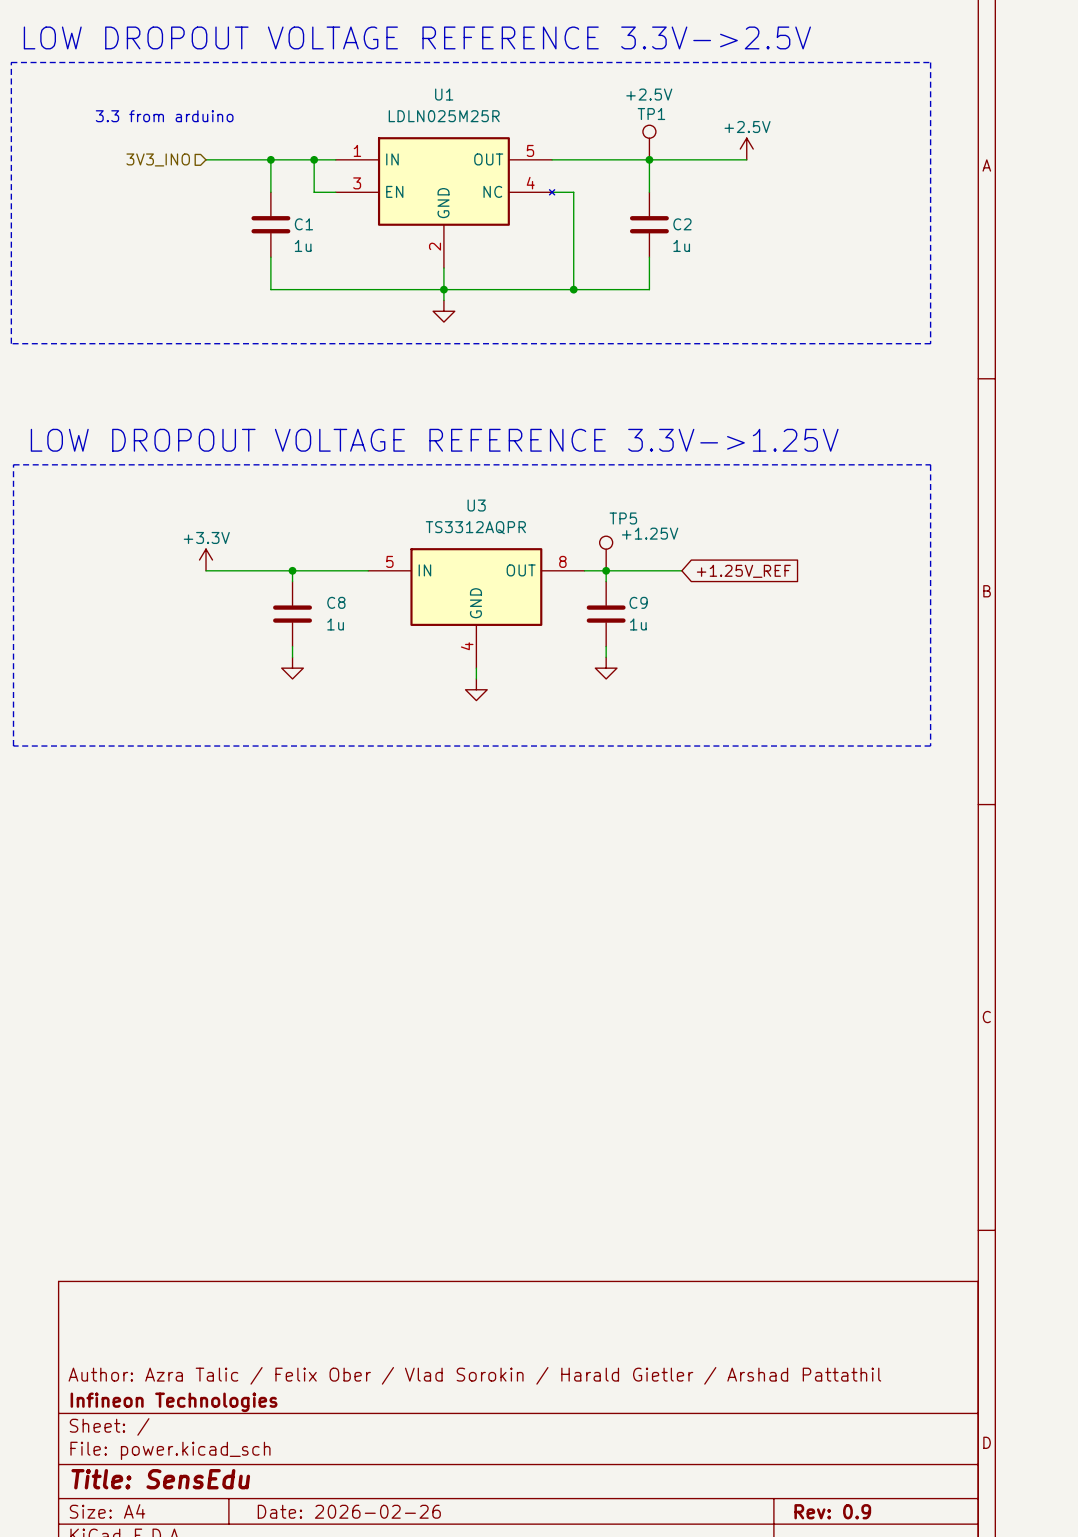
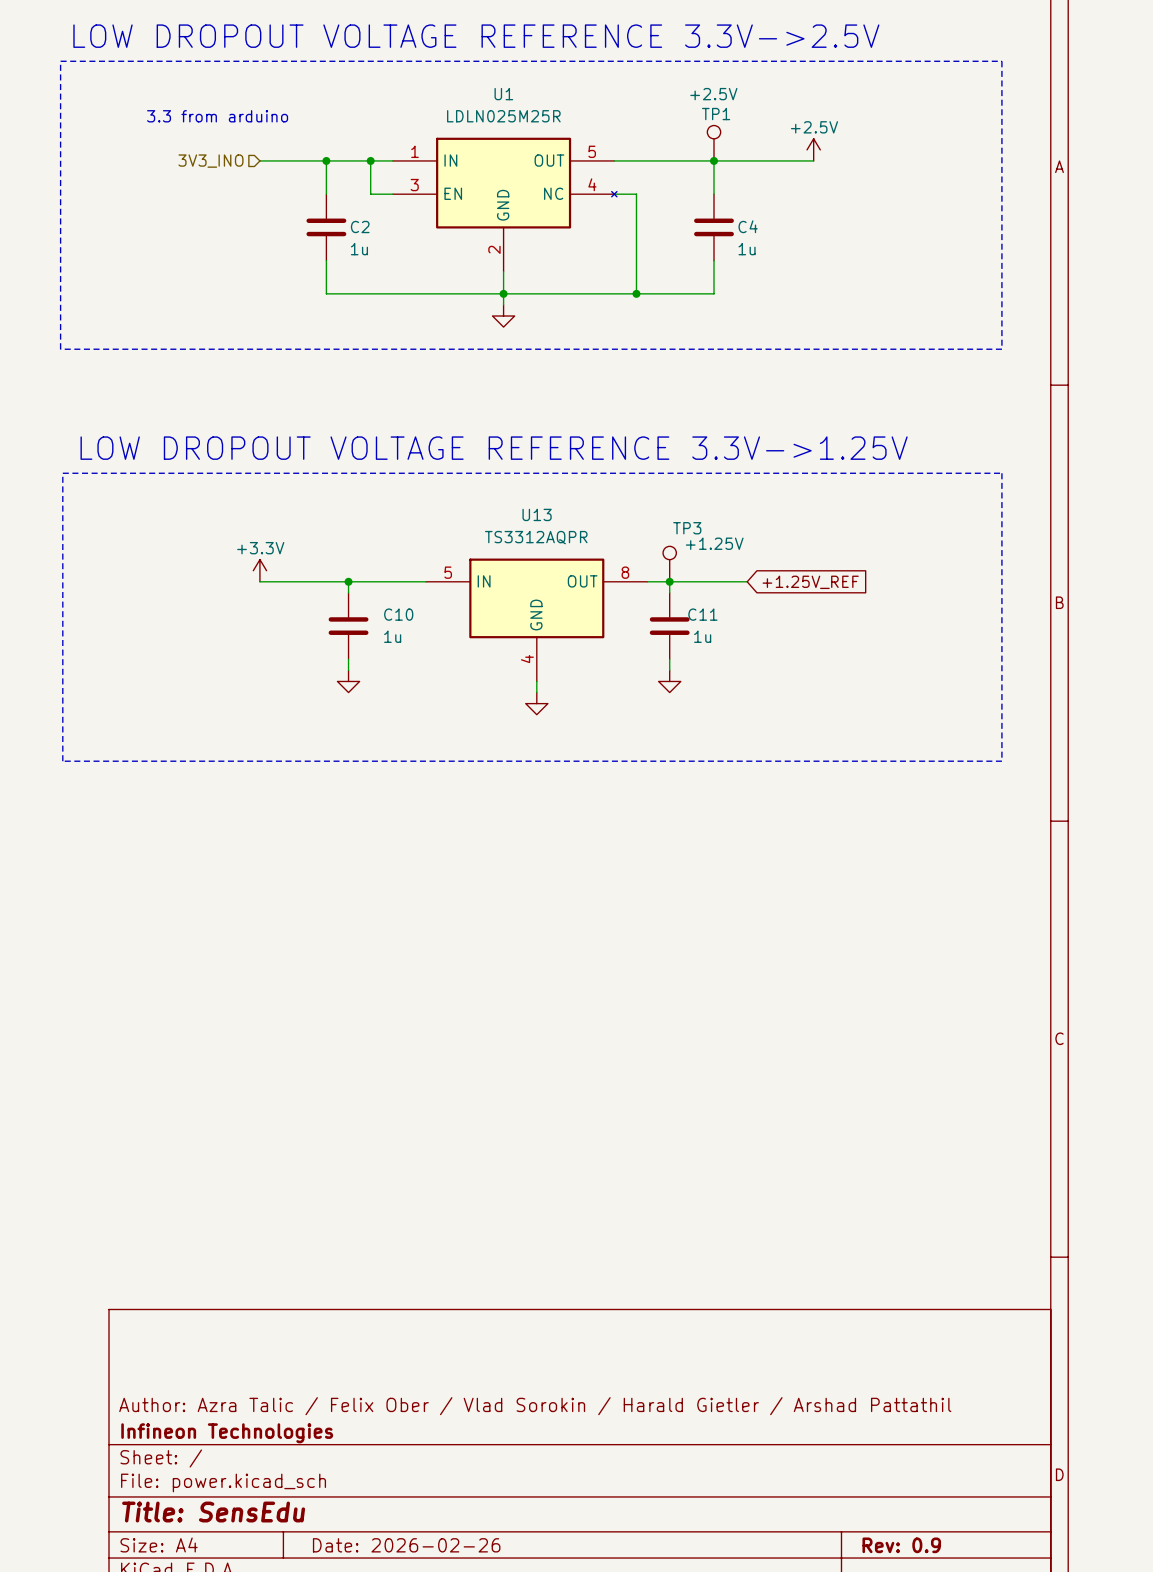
C1 name: C1 (303, 224) -> C2 (360, 227)
C2 name: C2 (682, 224) -> C4 (748, 226)
U3 name: U3 (476, 505) -> U13 (537, 514)
TP5 name: TP5 (623, 518) -> TP3 (687, 528)
C8 name: C8 (336, 602) -> C10 (398, 614)
C9 name: C9 (638, 602) -> C11 (702, 614)

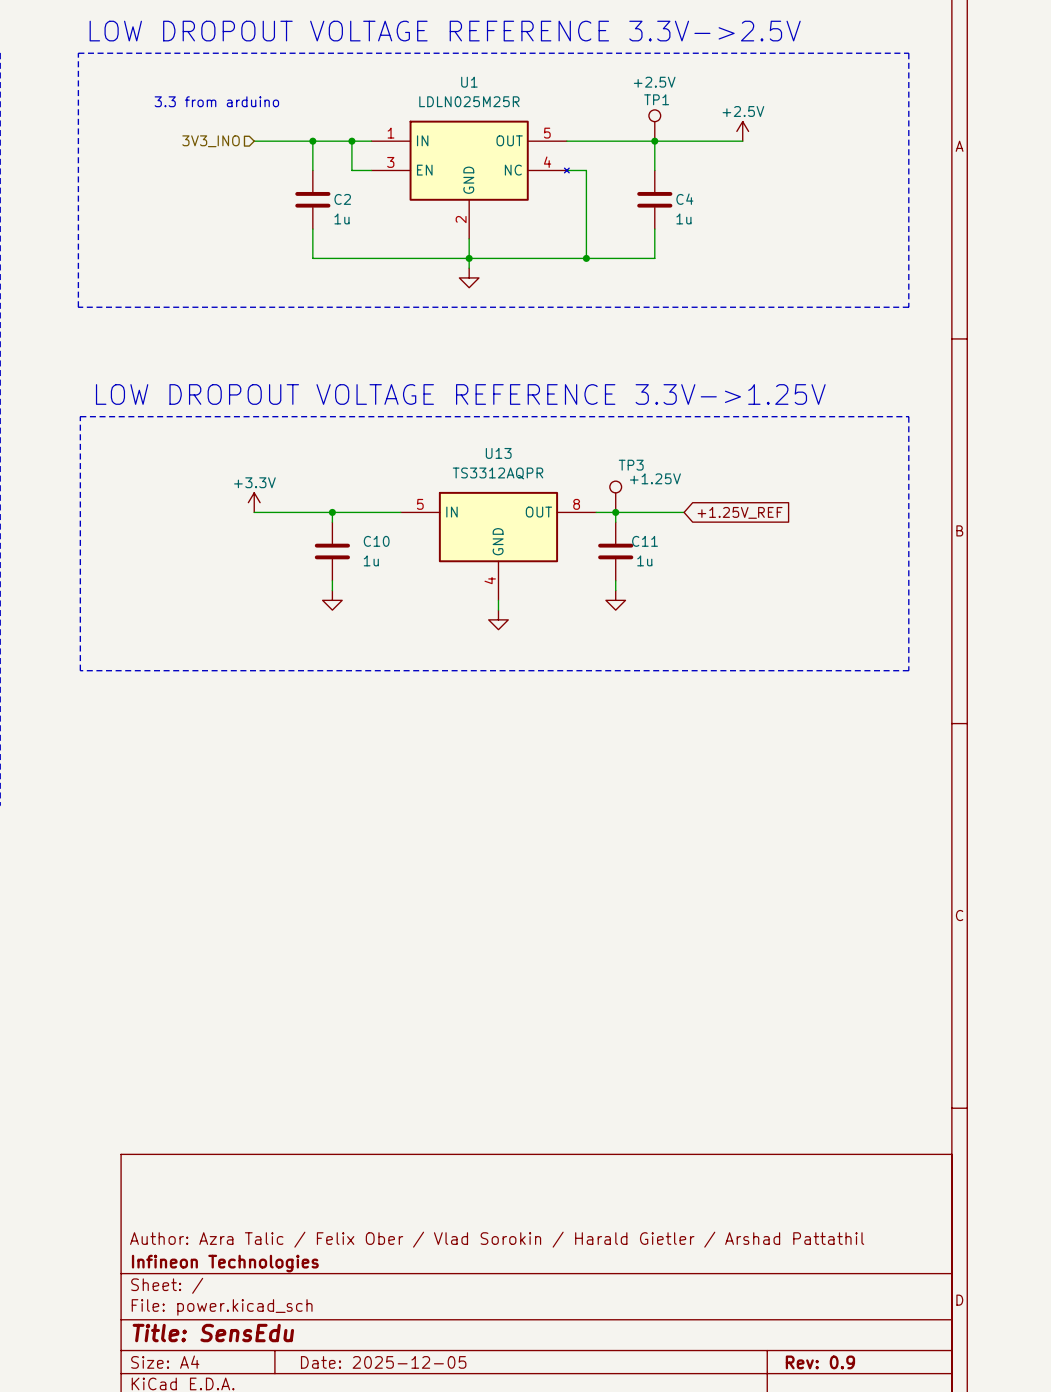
title block: Date: 2026-02-26 (406, 1545) -> Date: 2025-12-05 (383, 1362)

